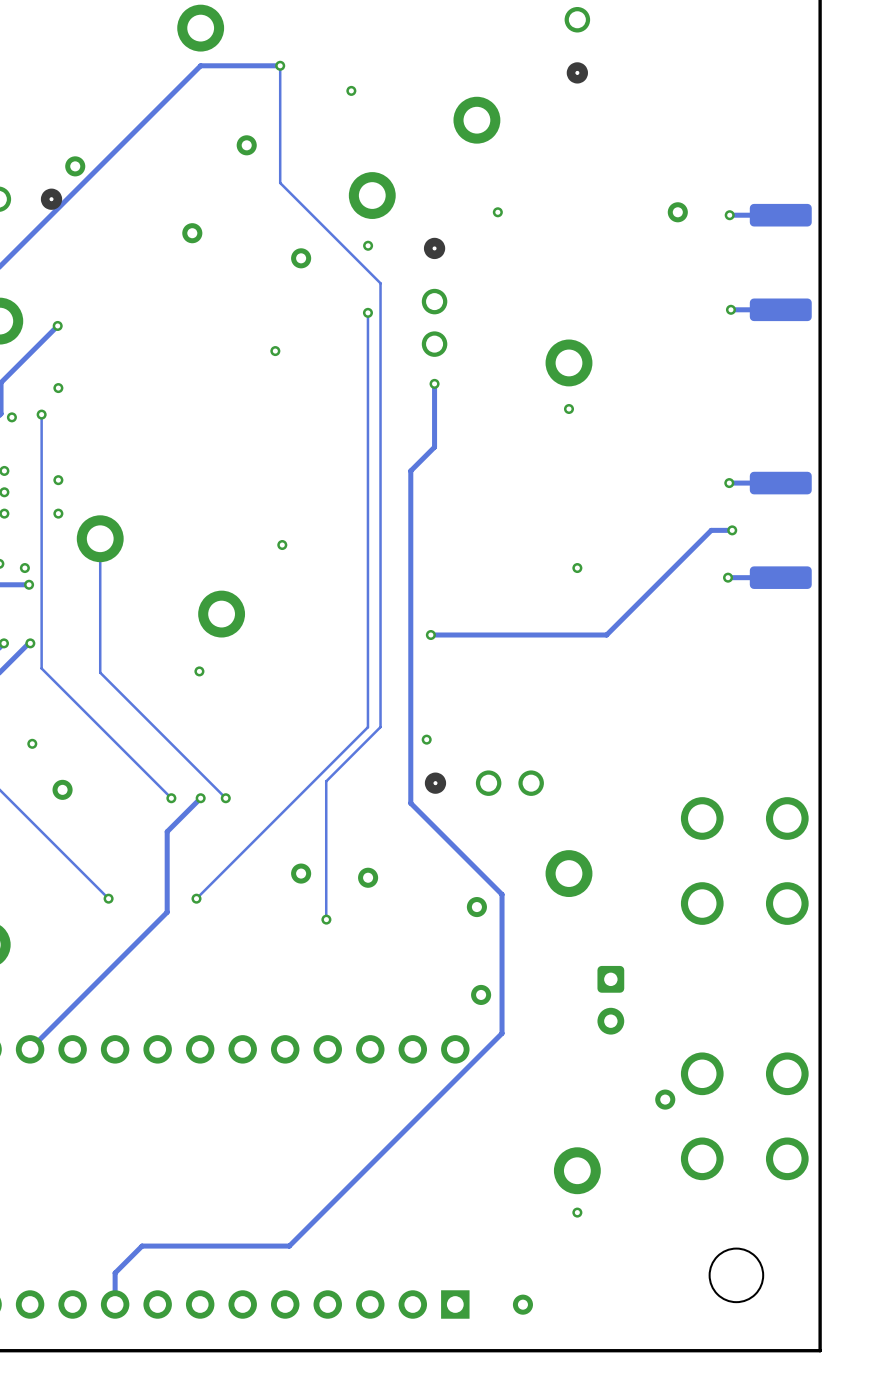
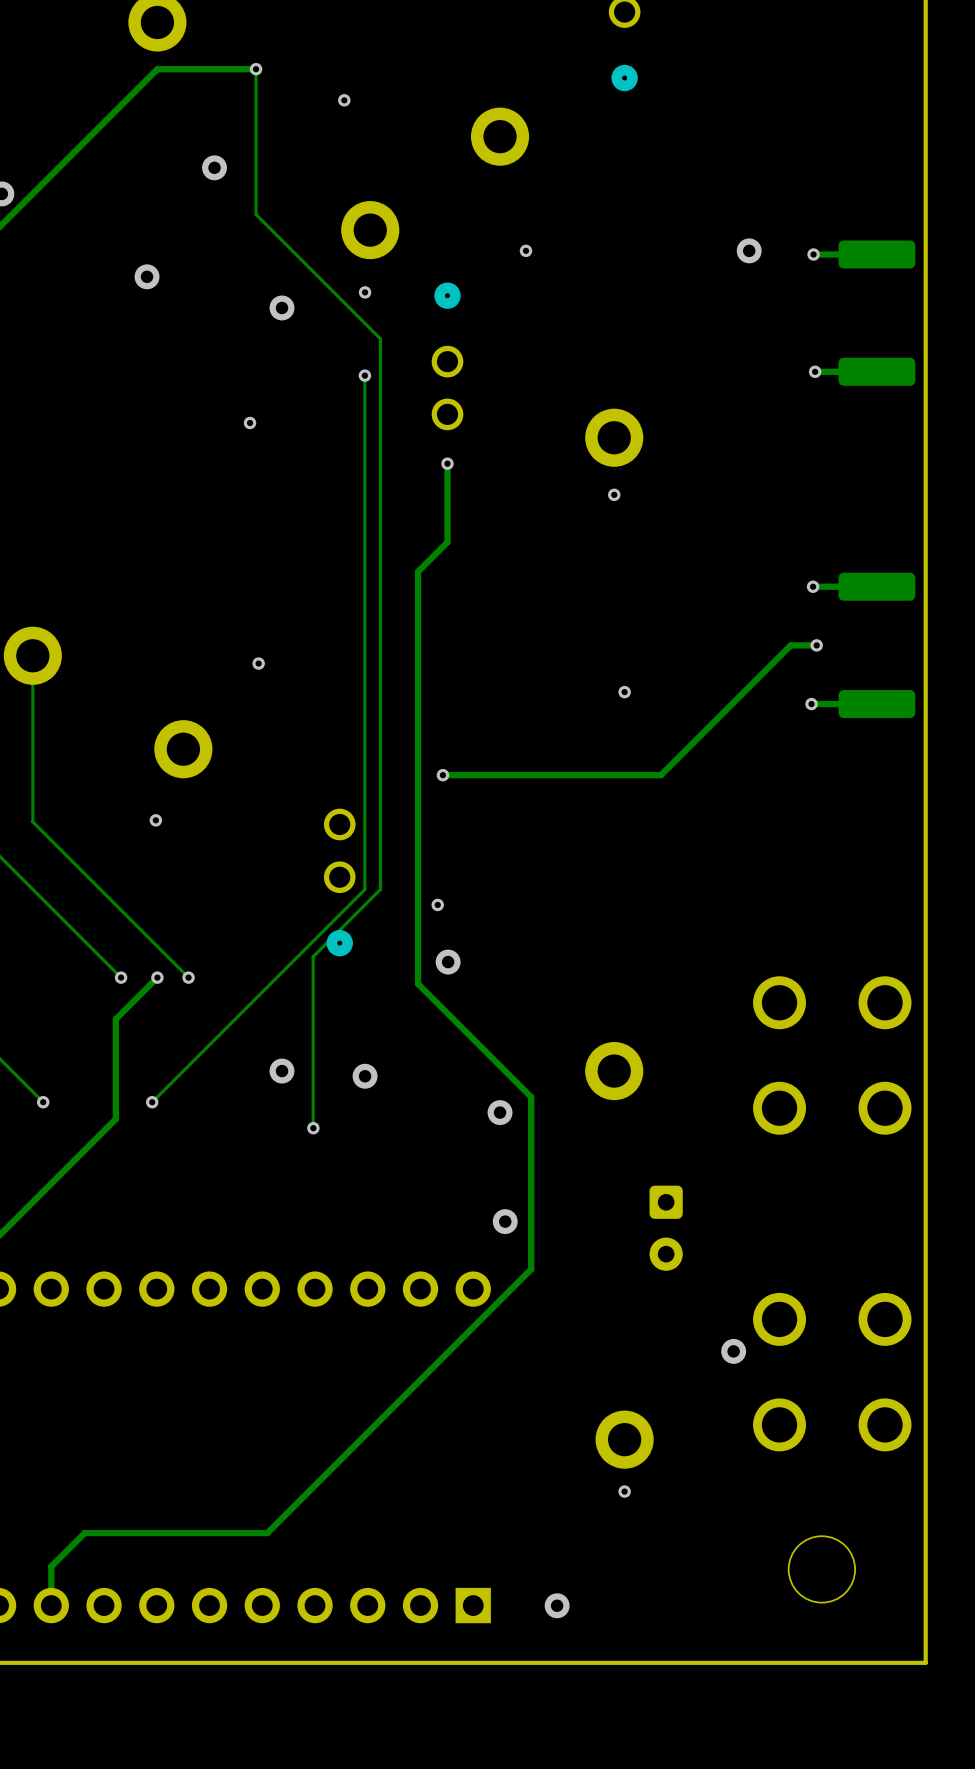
part rotation: 0° (484, 783) -> 90° counterclockwise (339, 882)
part position: (484, 783) -> (339, 882)
via: none -> (448, 962)

